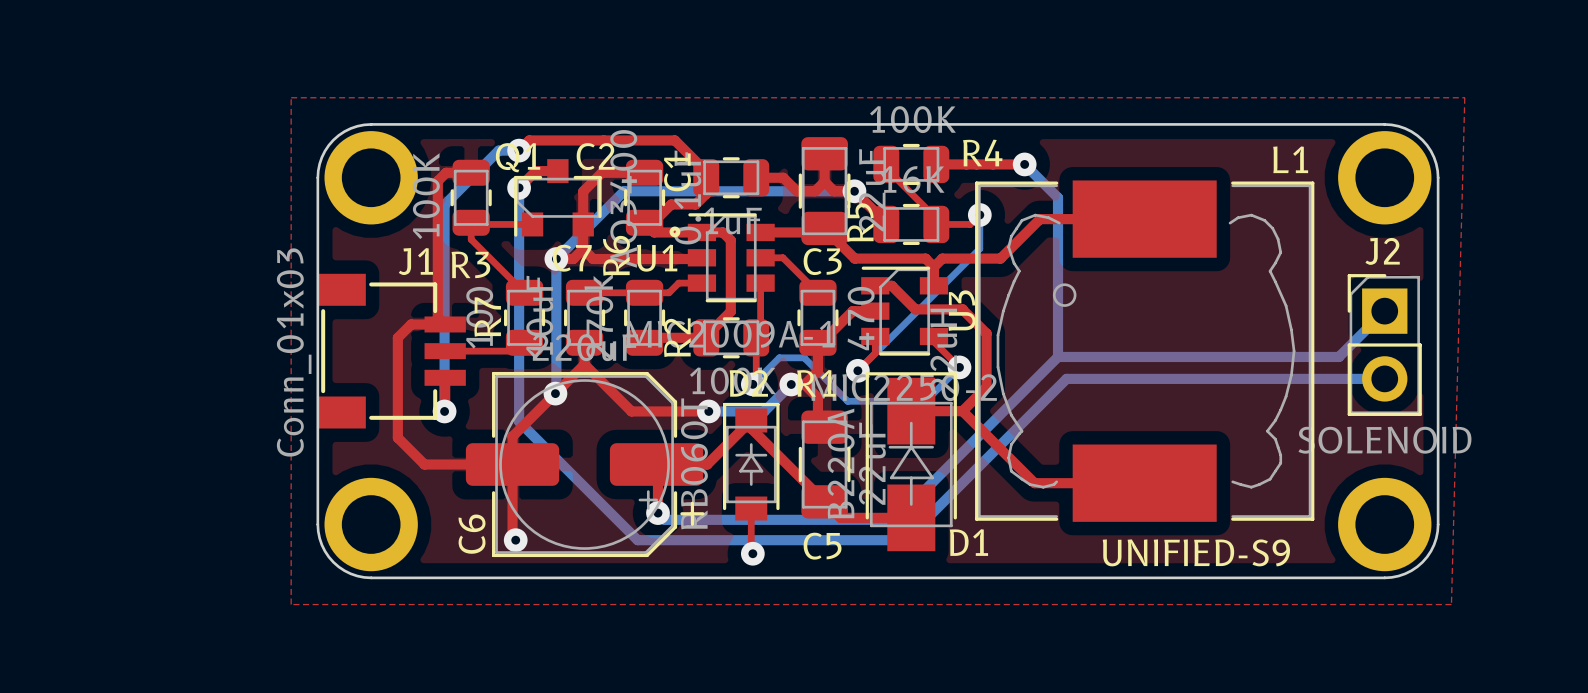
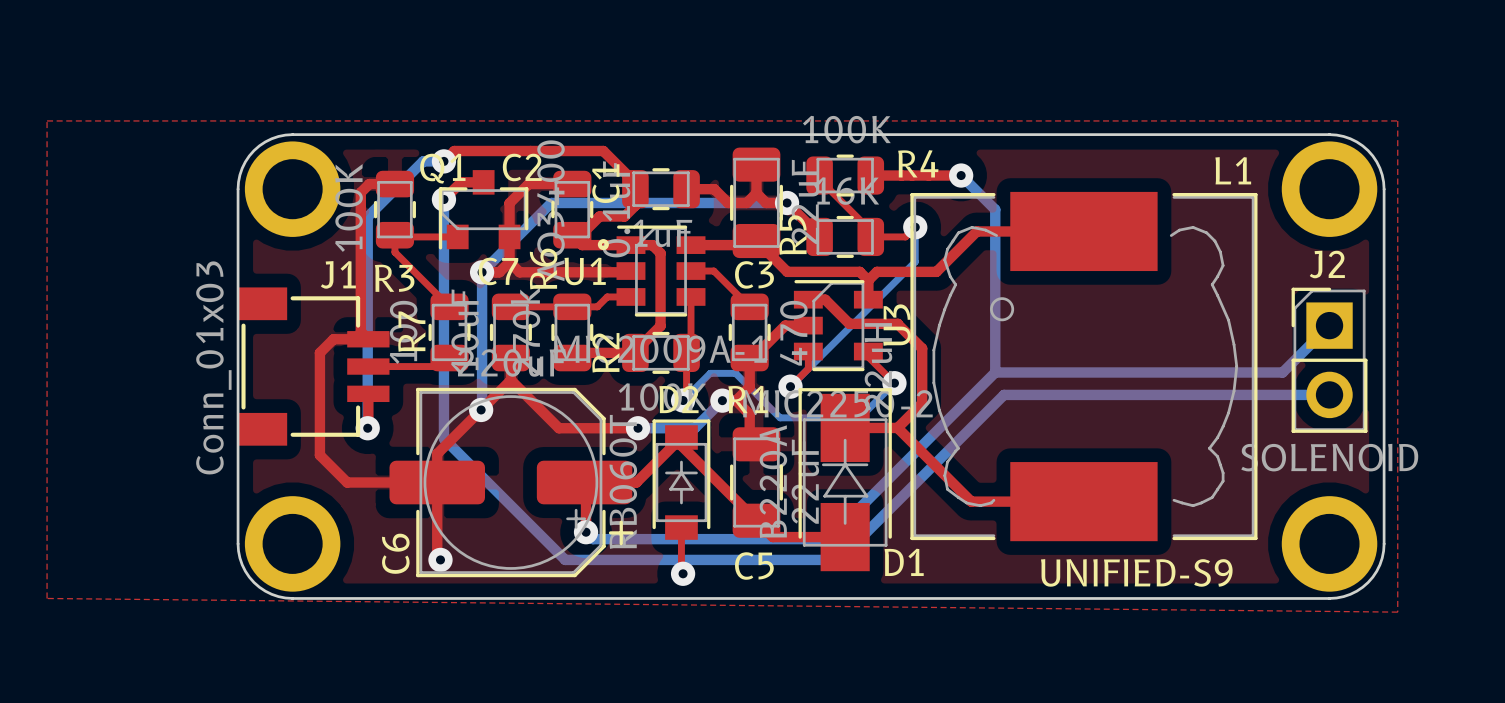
top zone outline: (291, 97) (1464, 97) (1451, 604) (291, 604) (291, 97) -> (47, 120) (47, 598) (1397, 612) (1397, 120) (47, 120)

